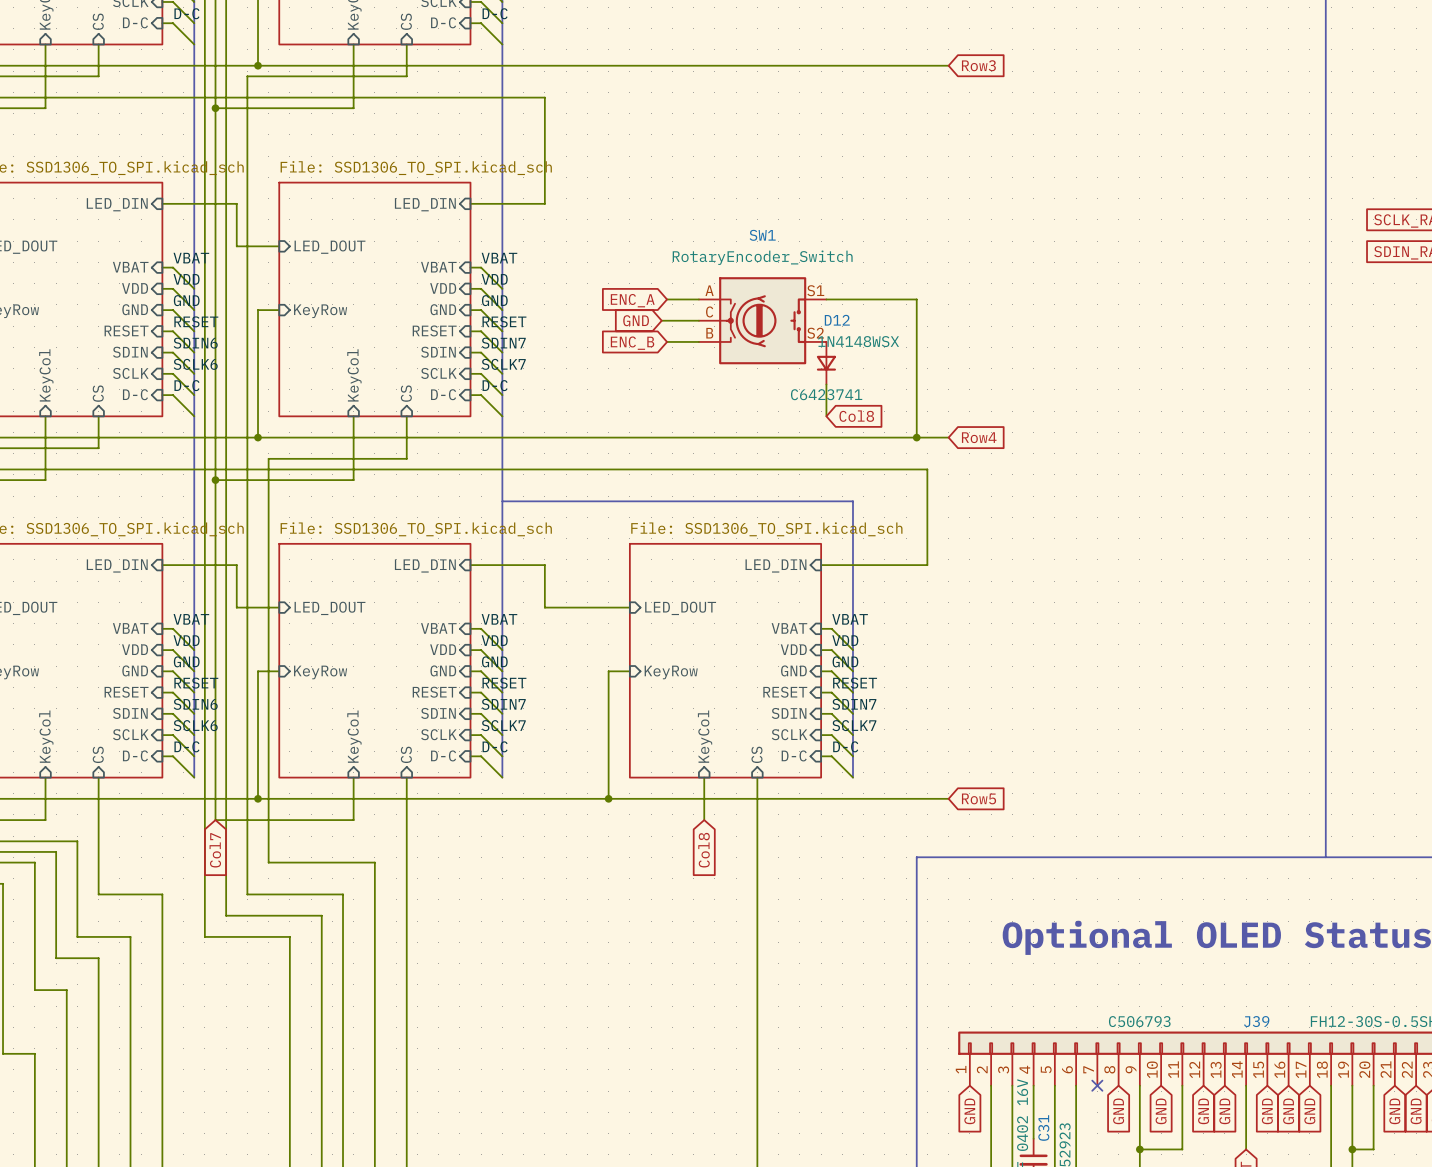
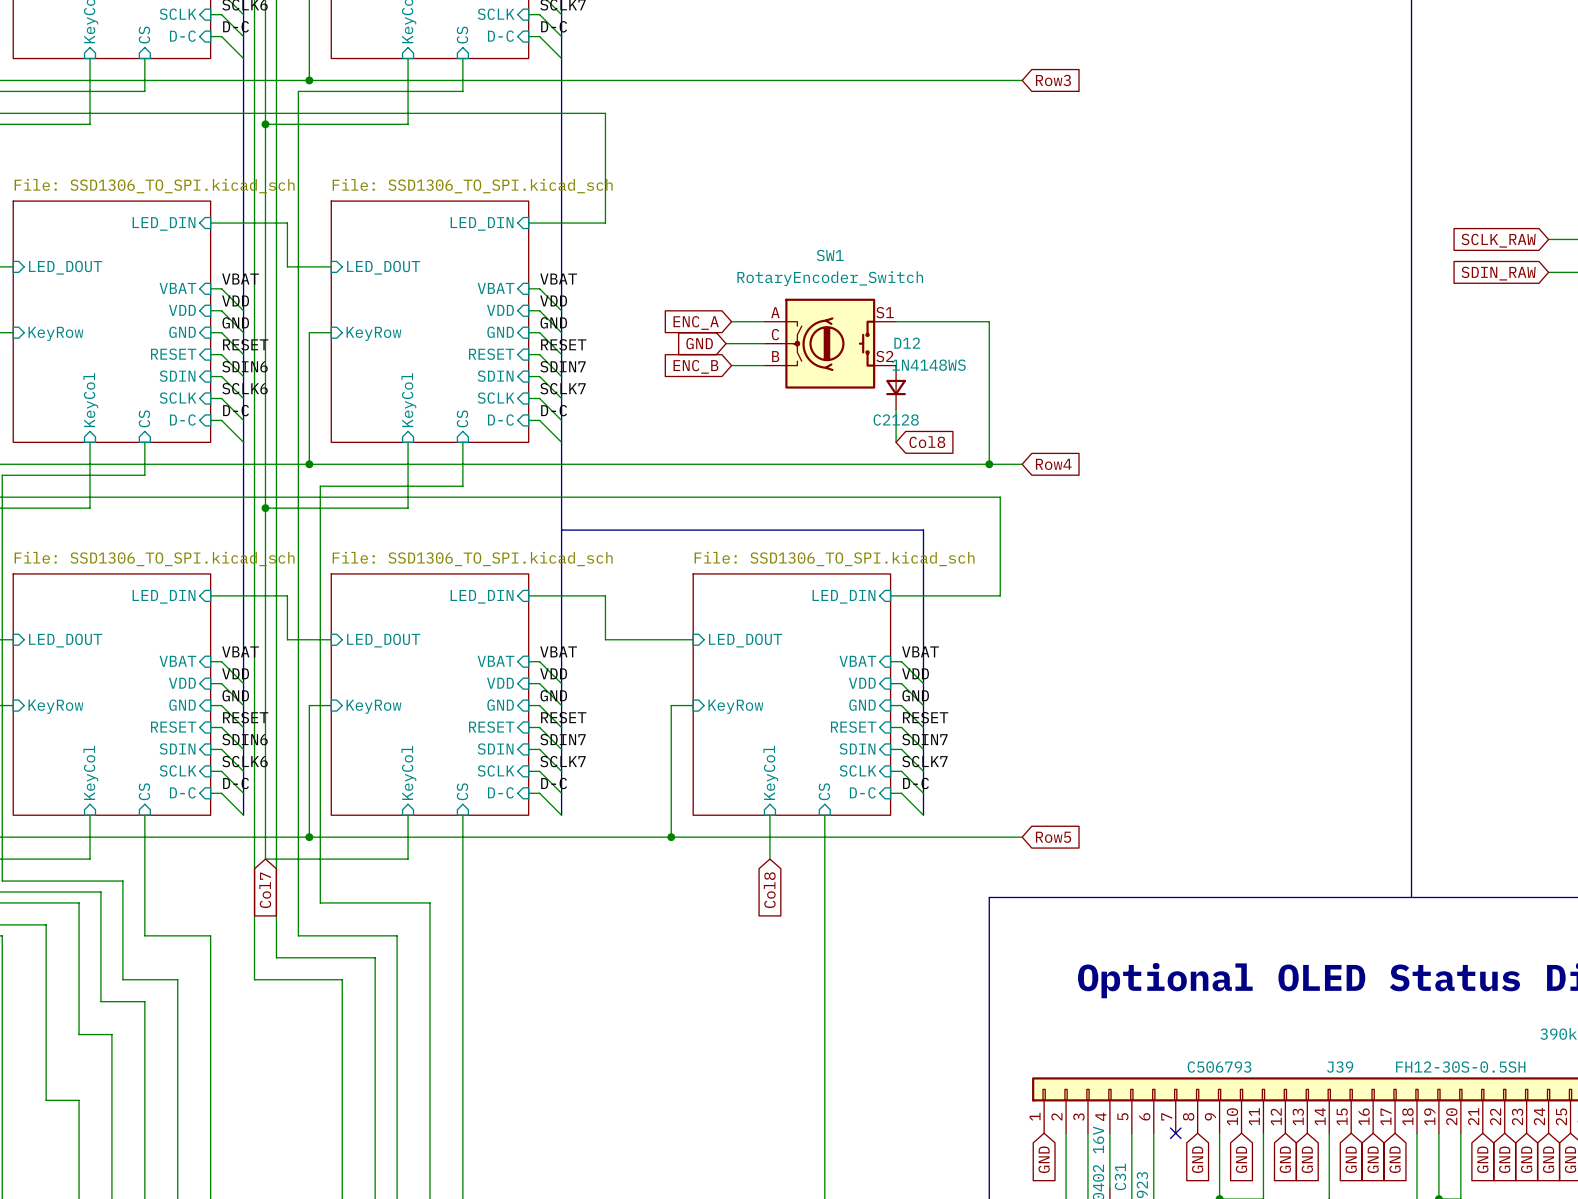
D12 value: 1N4148WSX (858, 341) -> 1N4148WS (928, 365)
D12 text: C6423741 (826, 394) -> C2128 (896, 420)

